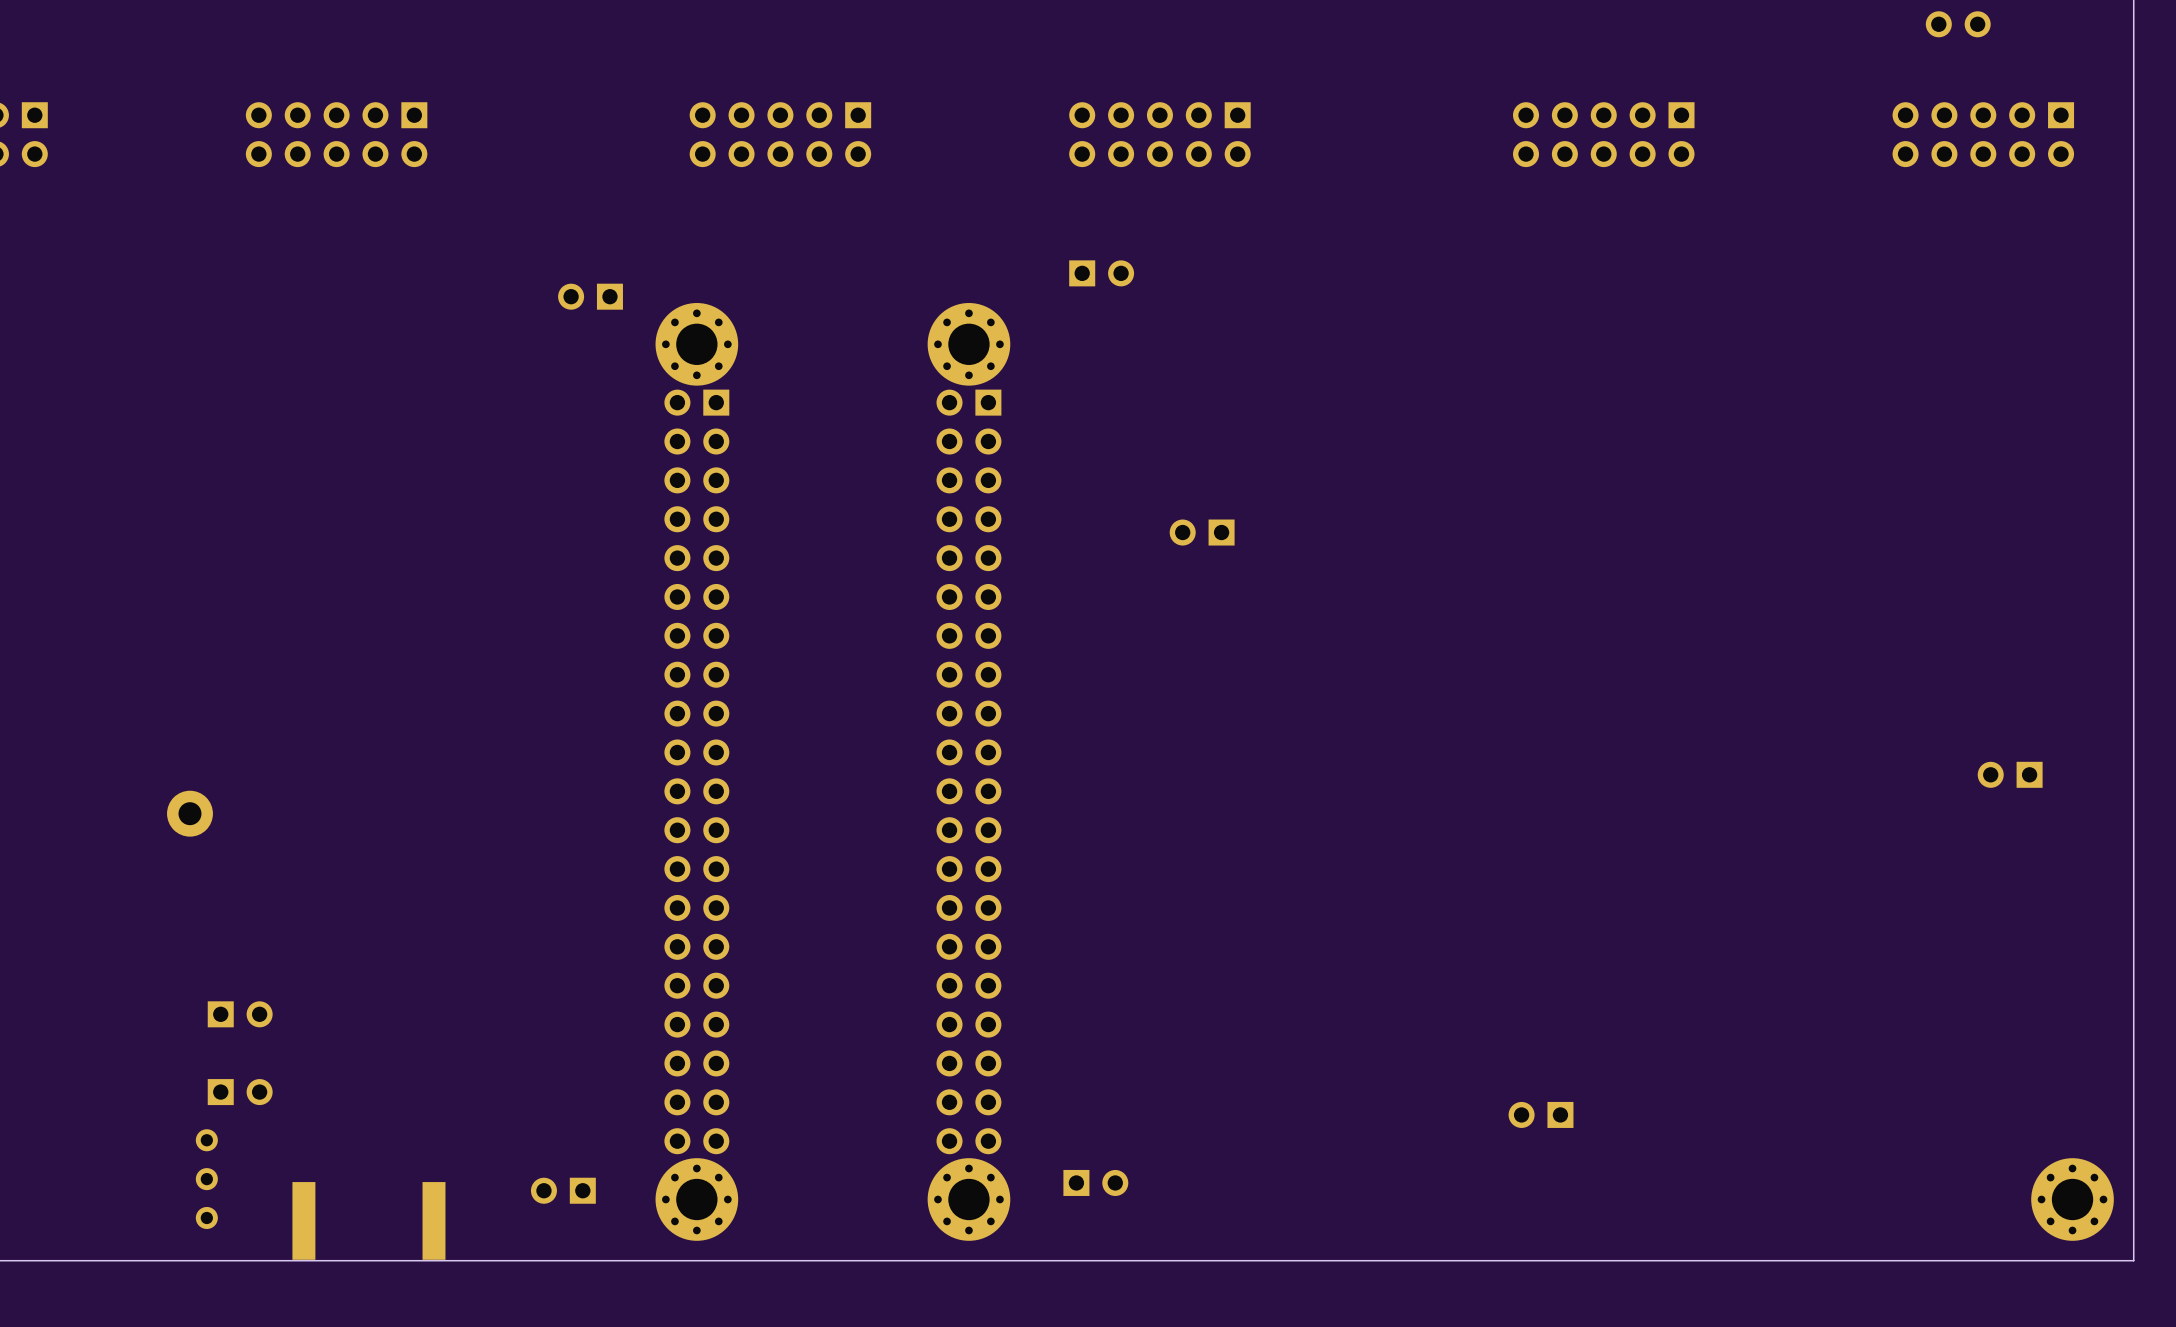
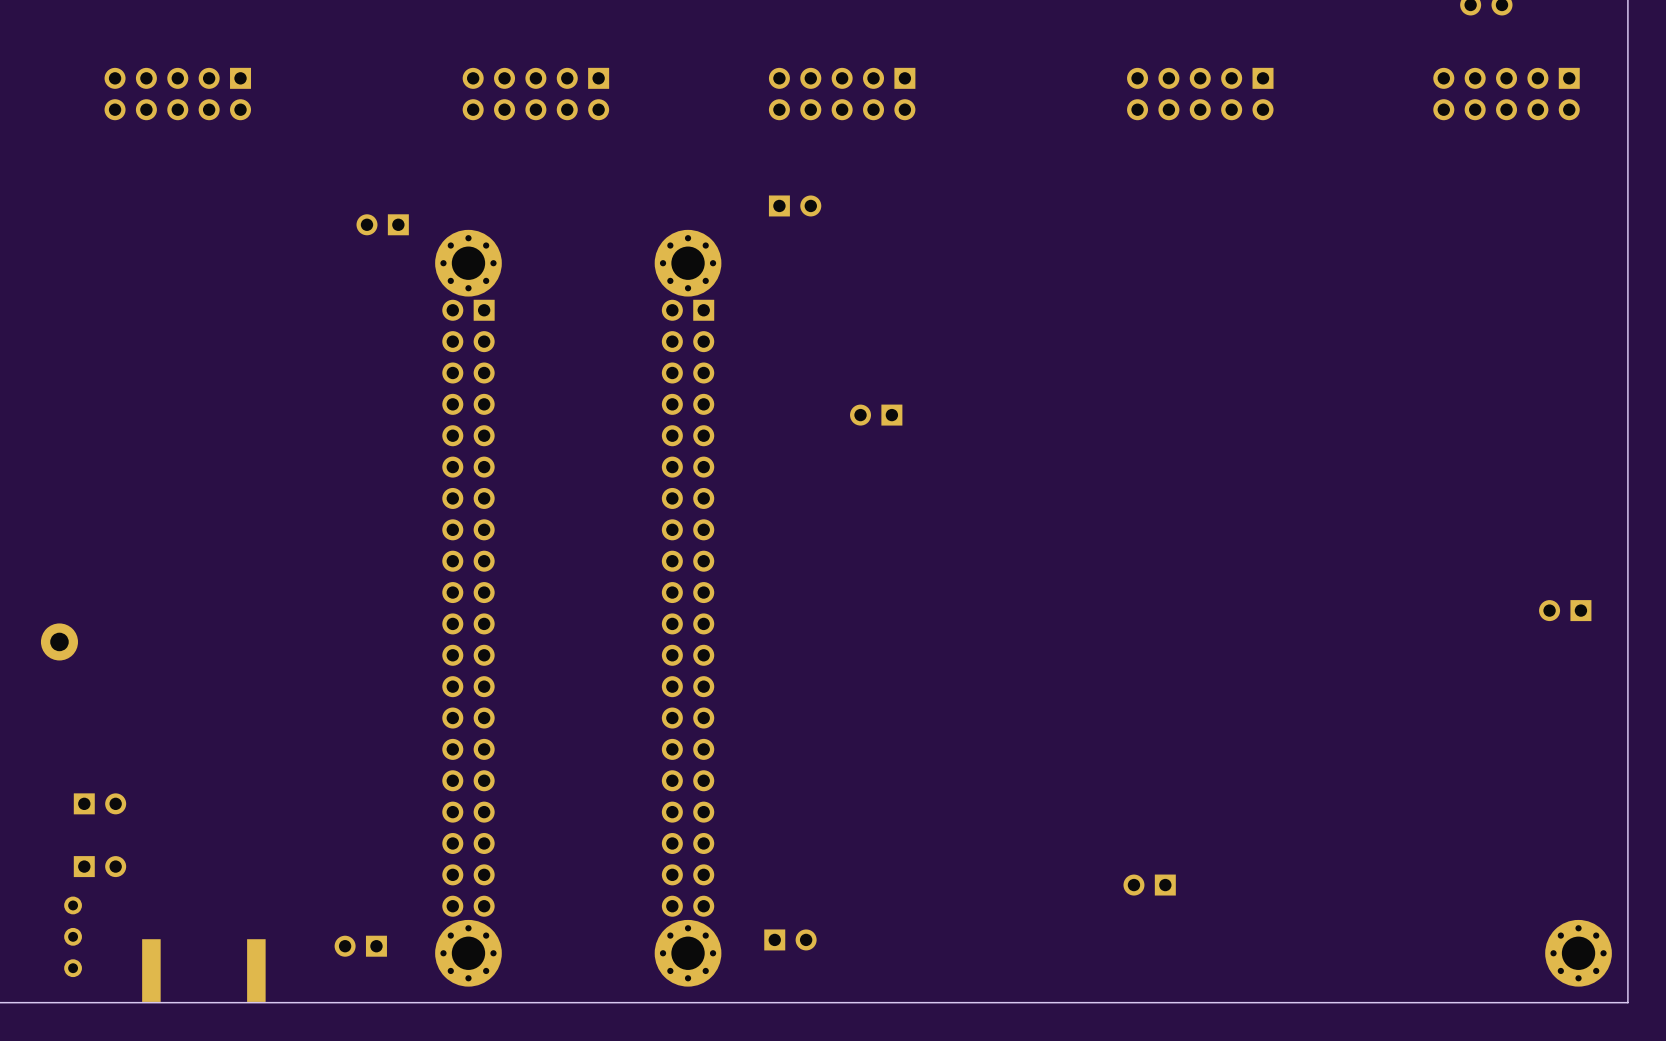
part position: (2010, 774) -> (1565, 610)

